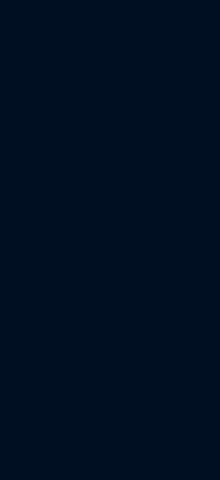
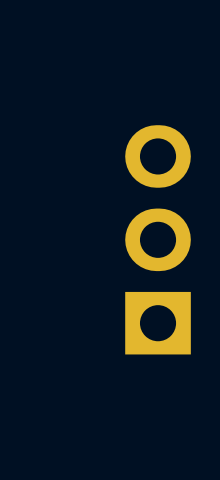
part: none -> (158, 239)

